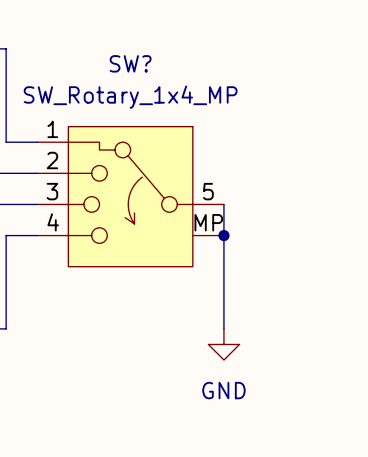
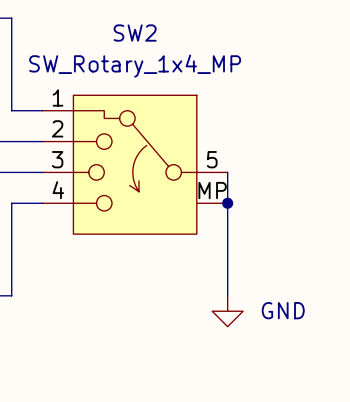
SW? name: SW? (130, 63) -> SW2 (135, 33)
power symbol text position: GND (223, 390) -> GND (283, 310)

